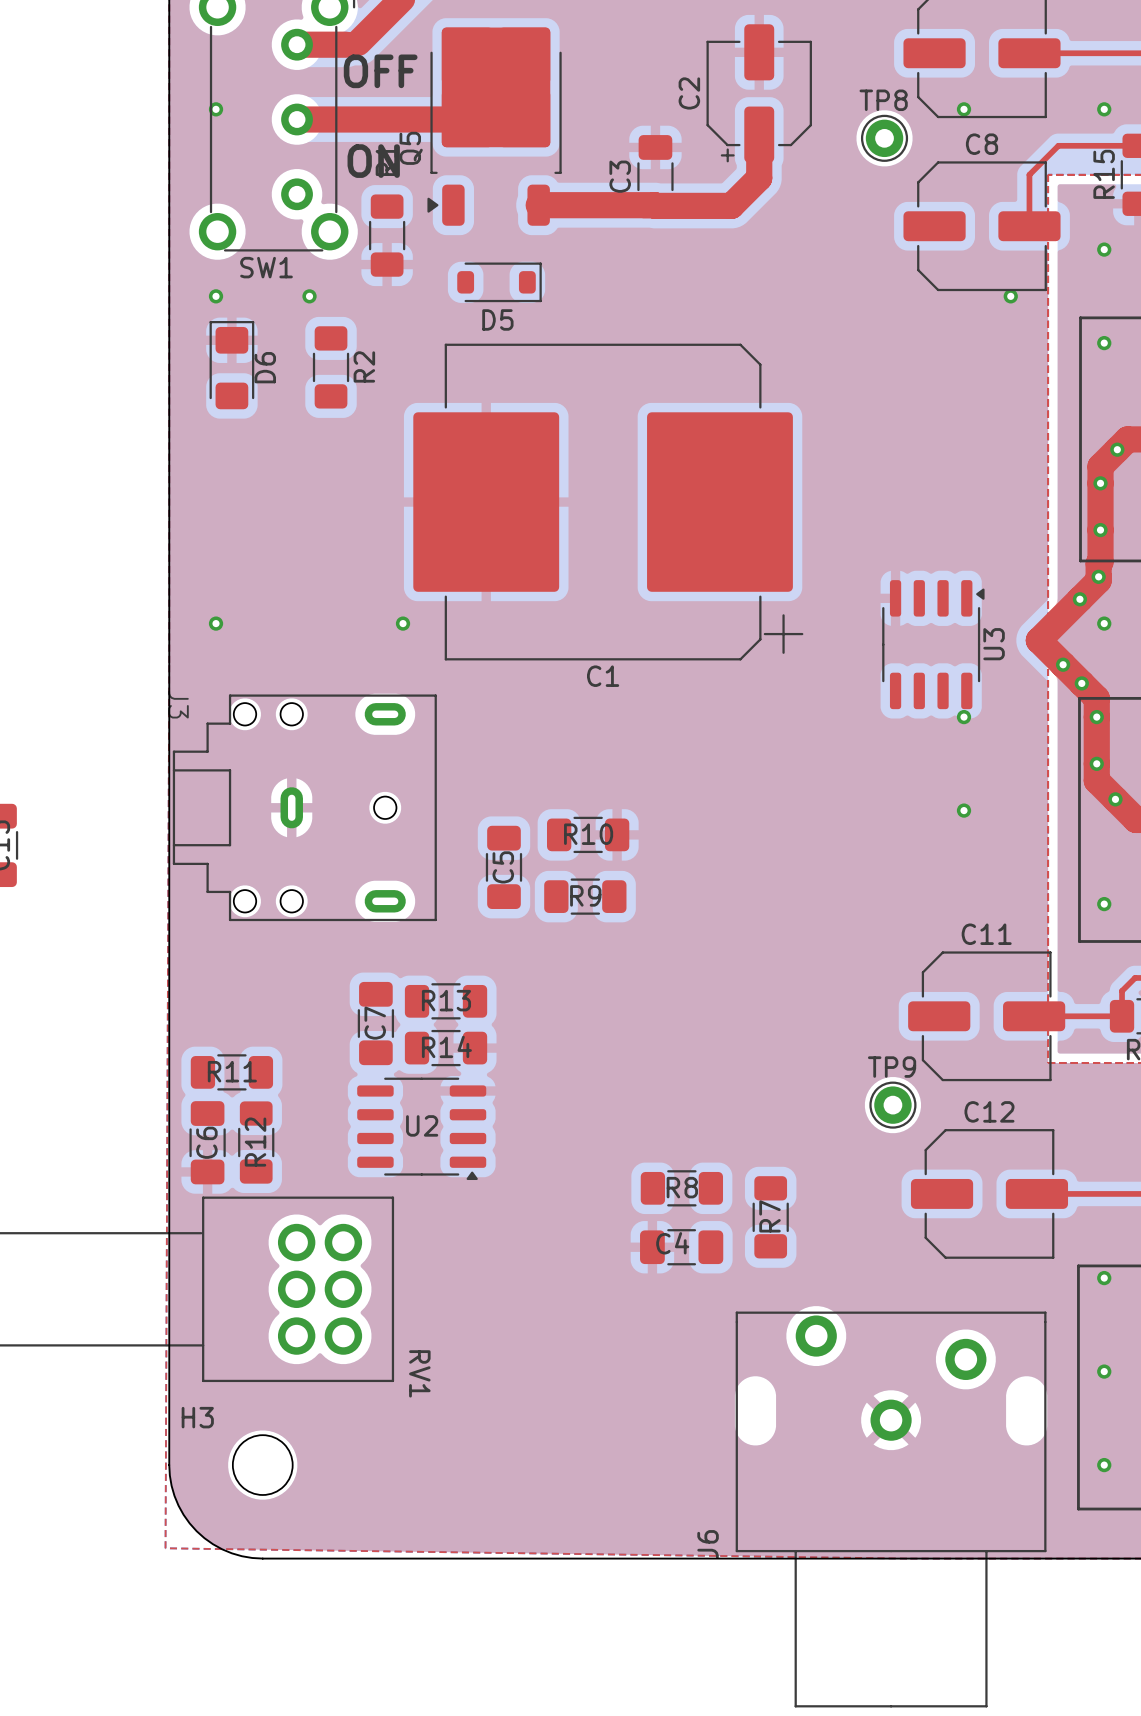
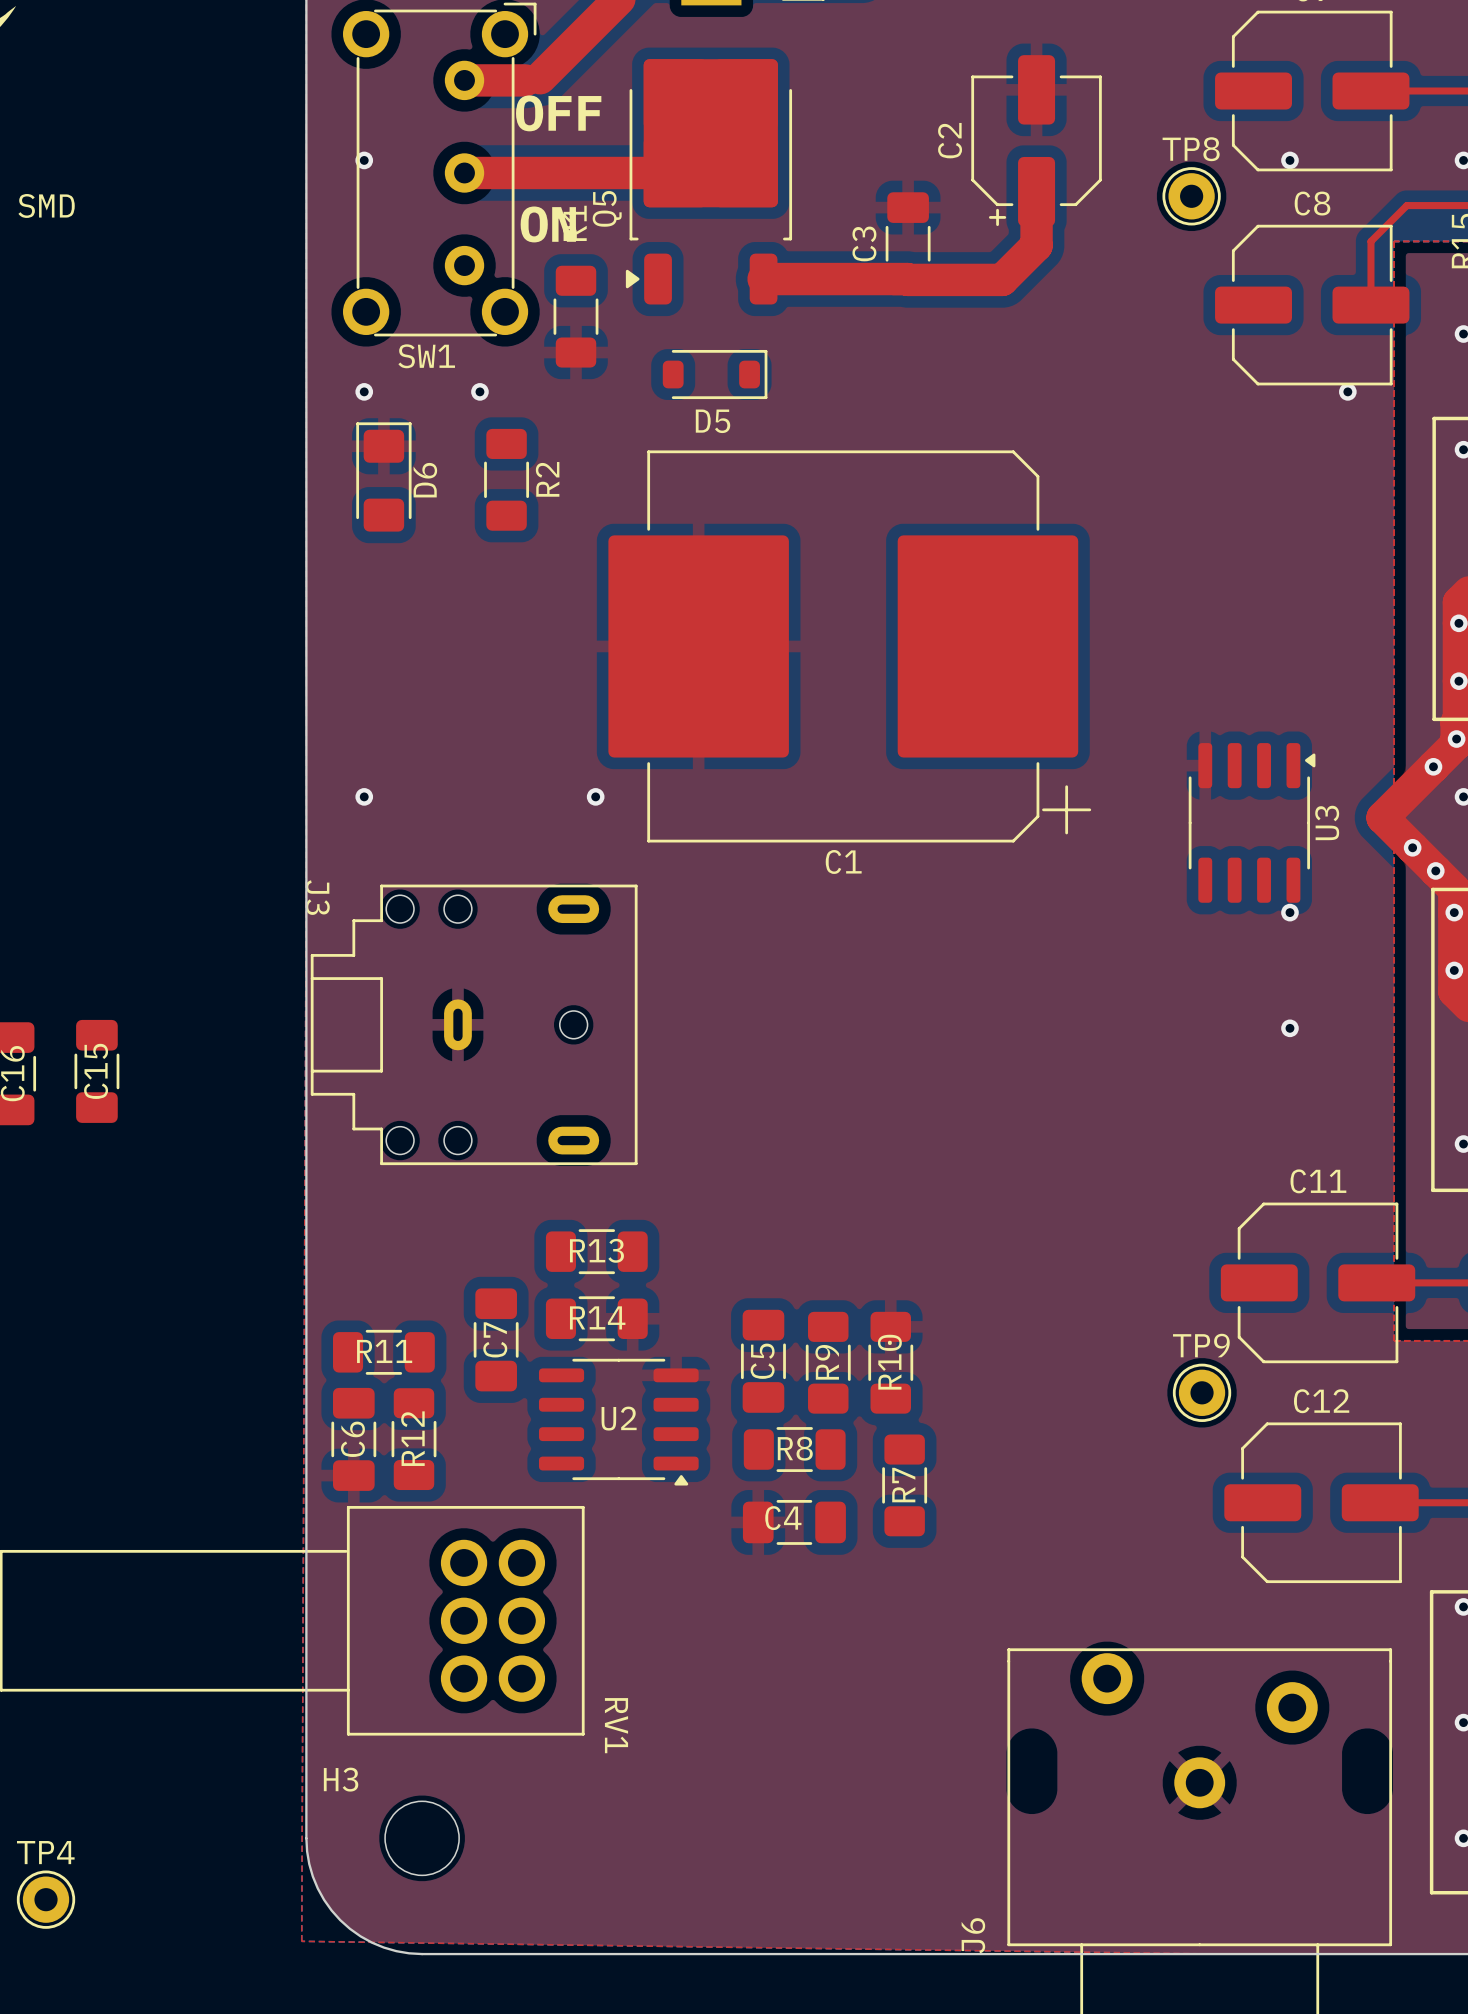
R10 rotation: 0° (588, 834) -> 90° clockwise (890, 1362)
R10 position: (588, 834) -> (890, 1362)
C5 position: (503, 867) -> (763, 1361)
R9 rotation: 0° (585, 896) -> 90° clockwise (828, 1362)
R9 position: (585, 896) -> (828, 1362)
R13 position: (446, 1001) -> (596, 1251)
C7 position: (375, 1023) -> (496, 1339)
R14 position: (446, 1048) -> (596, 1318)
R8 position: (681, 1188) -> (794, 1449)
R7 position: (770, 1217) -> (904, 1485)
C4 position: (681, 1247) -> (794, 1522)

